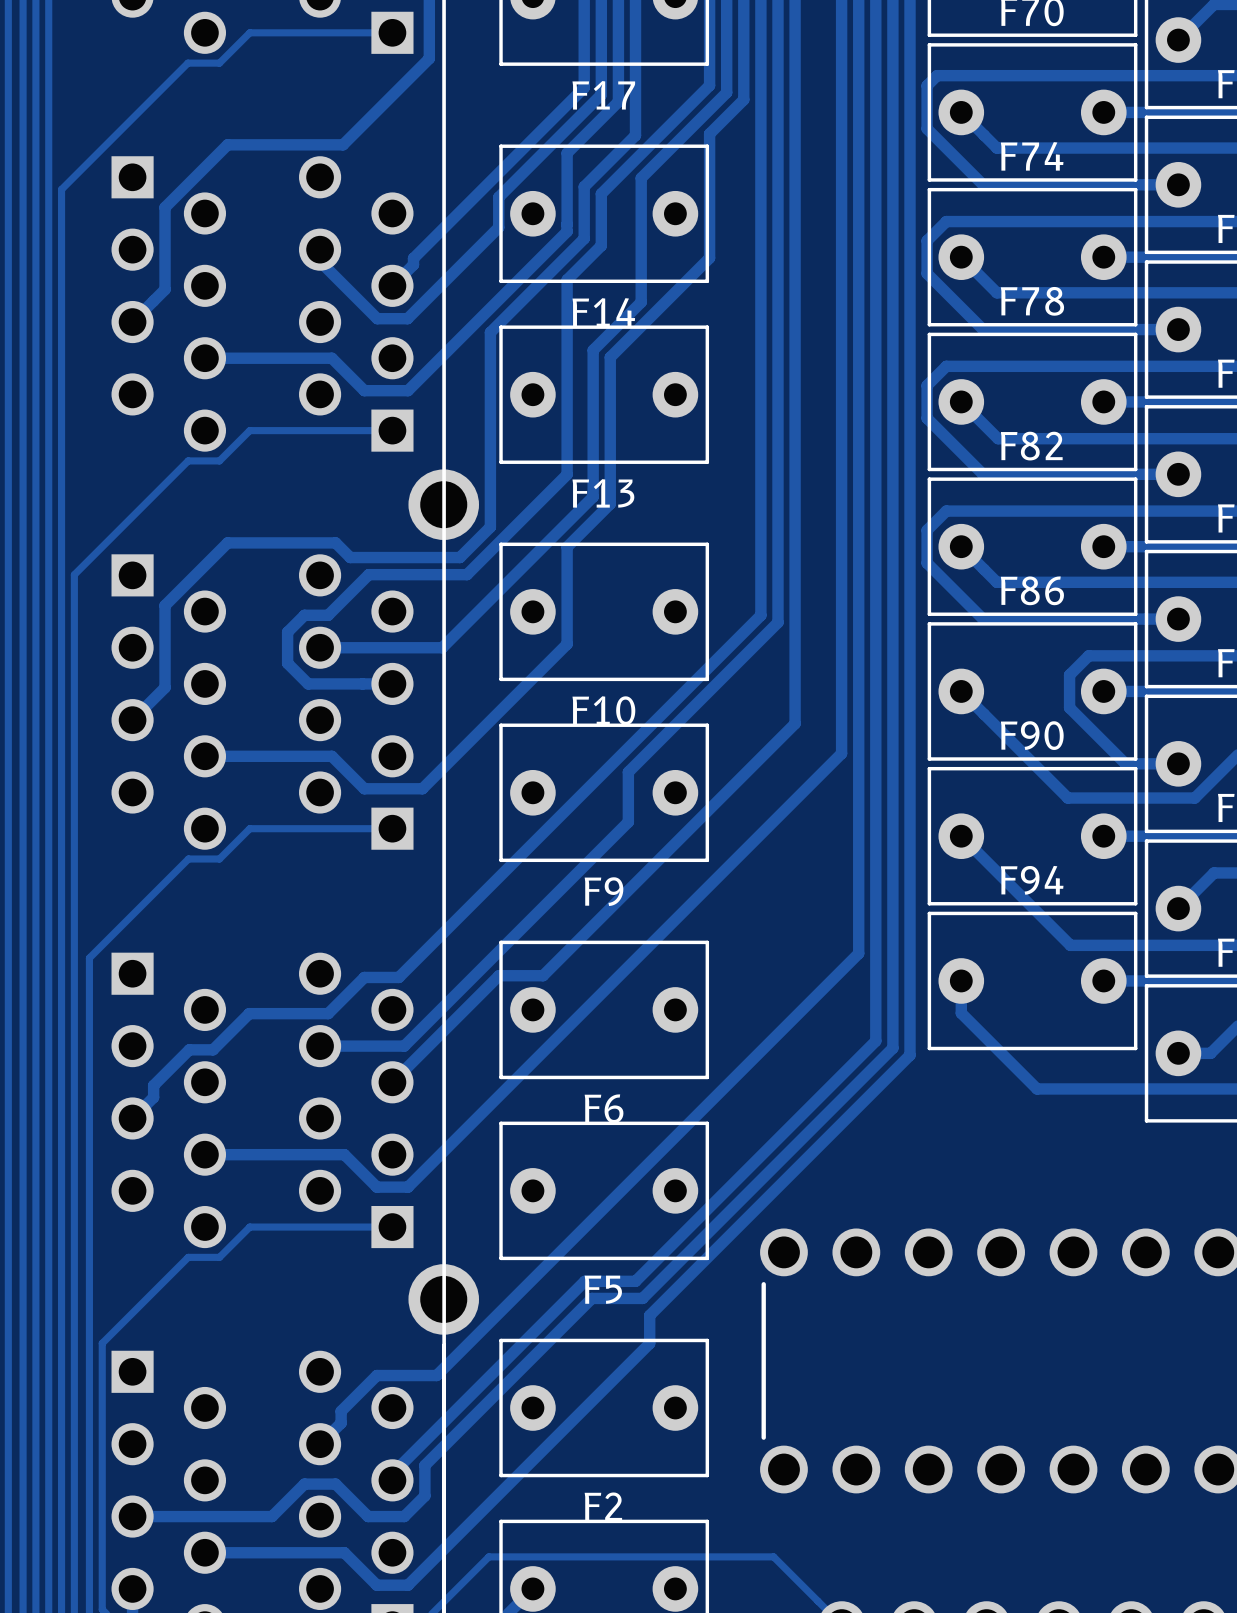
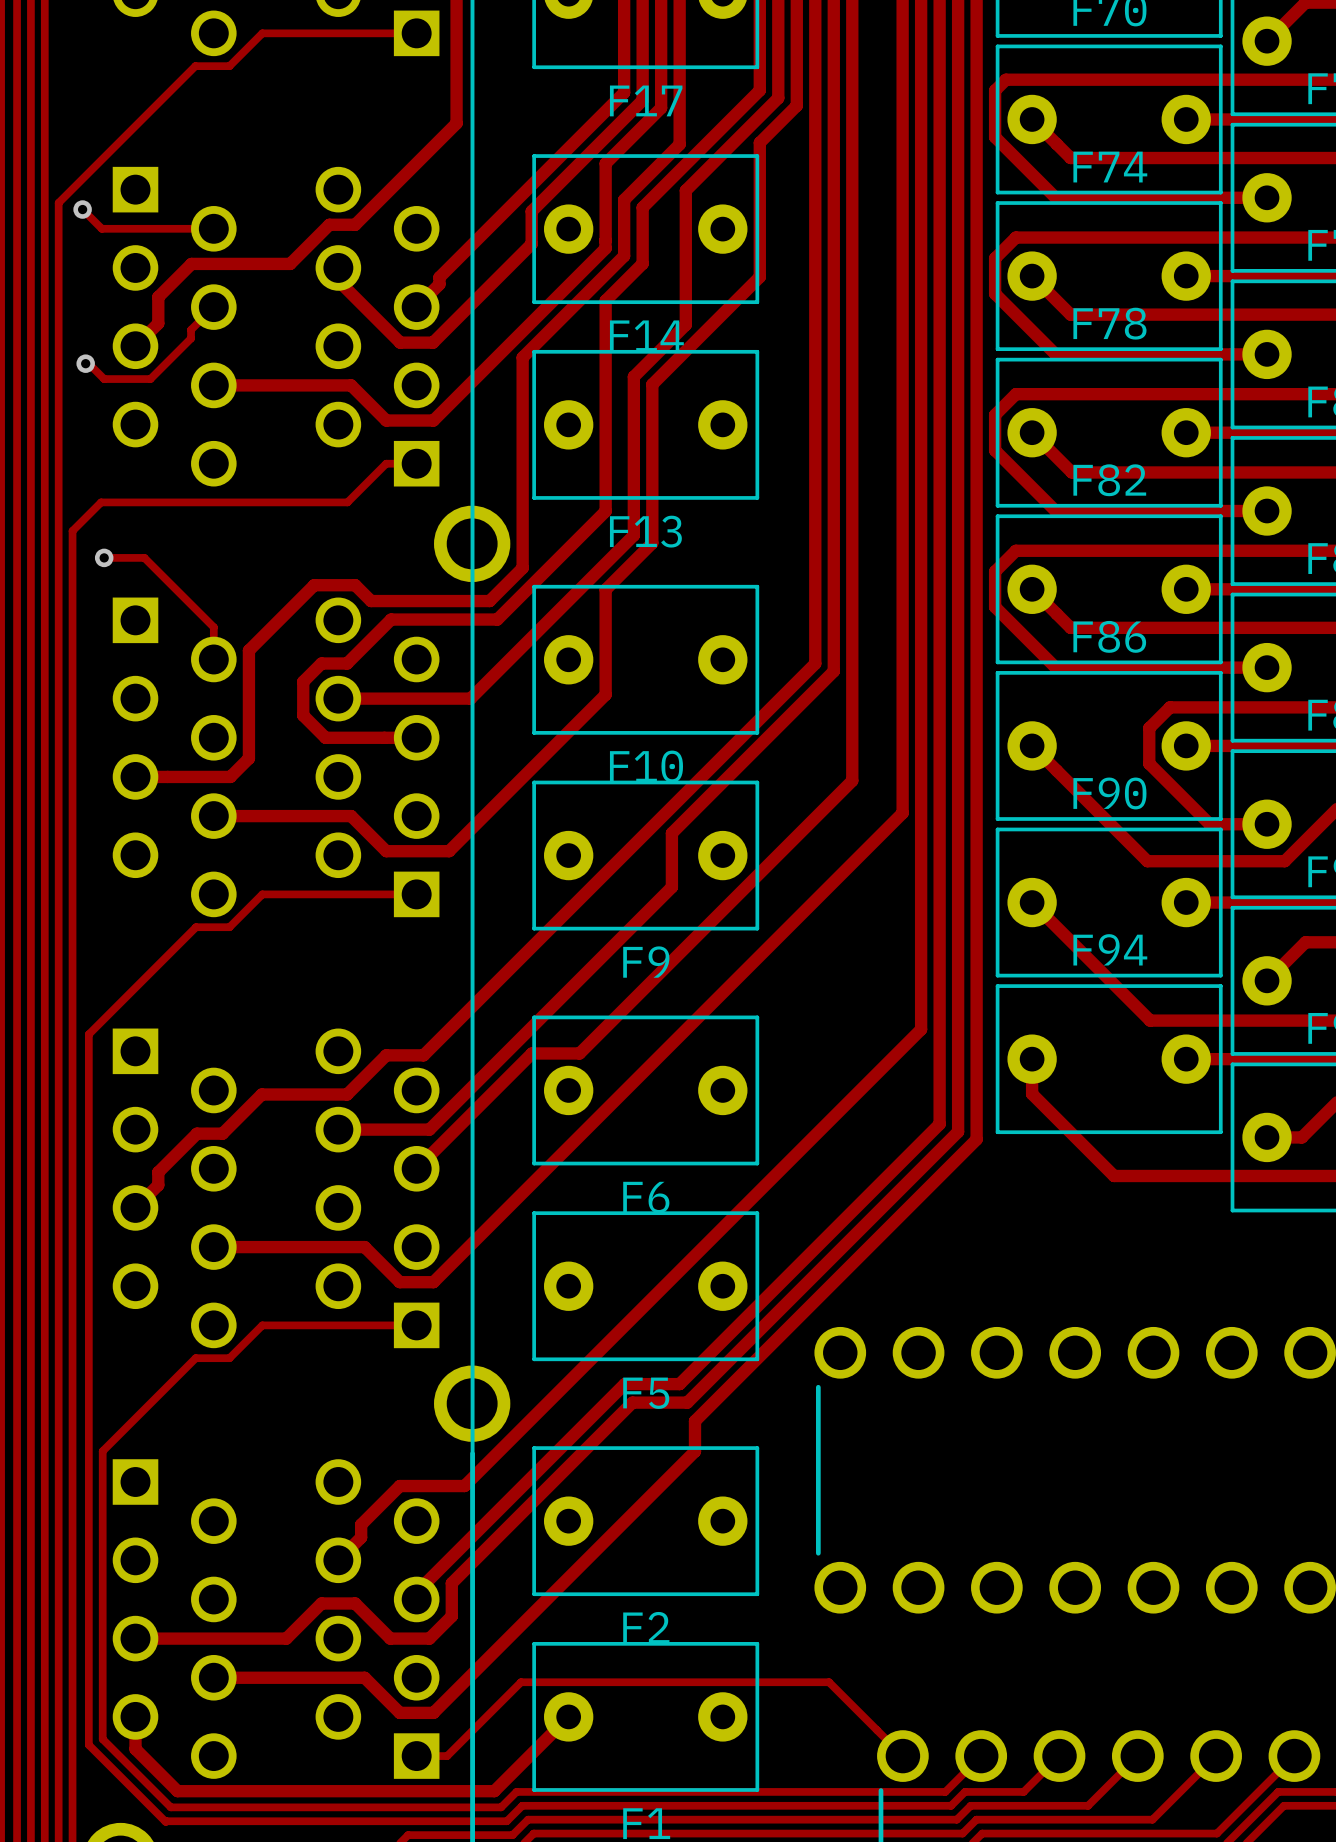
track: (429, 58) (343, 144) (227, 144) (165, 207) (165, 289) (153, 300) -> (456, 61) (456, 123) (355, 224) (329, 224) (290, 263) (191, 263) (158, 297) (158, 323)
track: none -> (82, 209) (101, 228) (213, 228)
via: none -> (82, 209)
track: none -> (213, 307) (191, 329) (191, 338) (150, 379) (104, 379) (88, 363) (85, 363)
via: none -> (85, 363)
track: (364, 430) (249, 430) (219, 460) (188, 460) (74, 574) -> (386, 463) (347, 502) (101, 502) (72, 530) (72, 619)
track: none -> (104, 557) (144, 557) (213, 627) (213, 659)
via: none -> (104, 557)
track: (297, 542) (227, 542) (165, 605) (165, 687) (132, 720) -> (314, 585) (248, 650) (248, 758) (230, 776) (135, 776)

